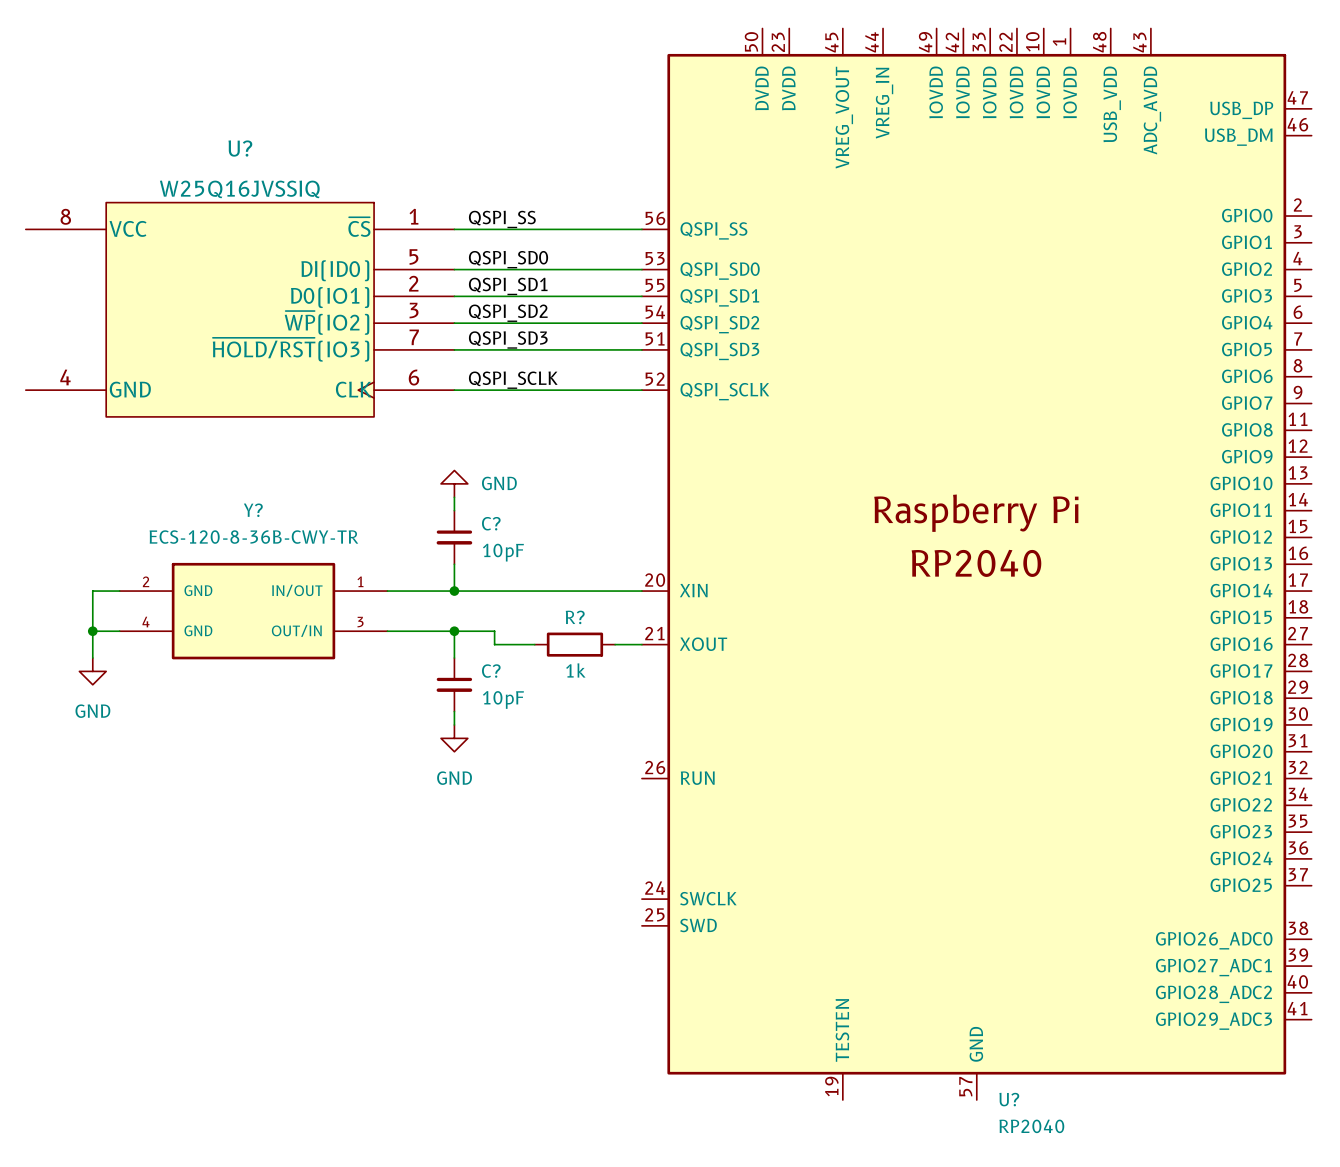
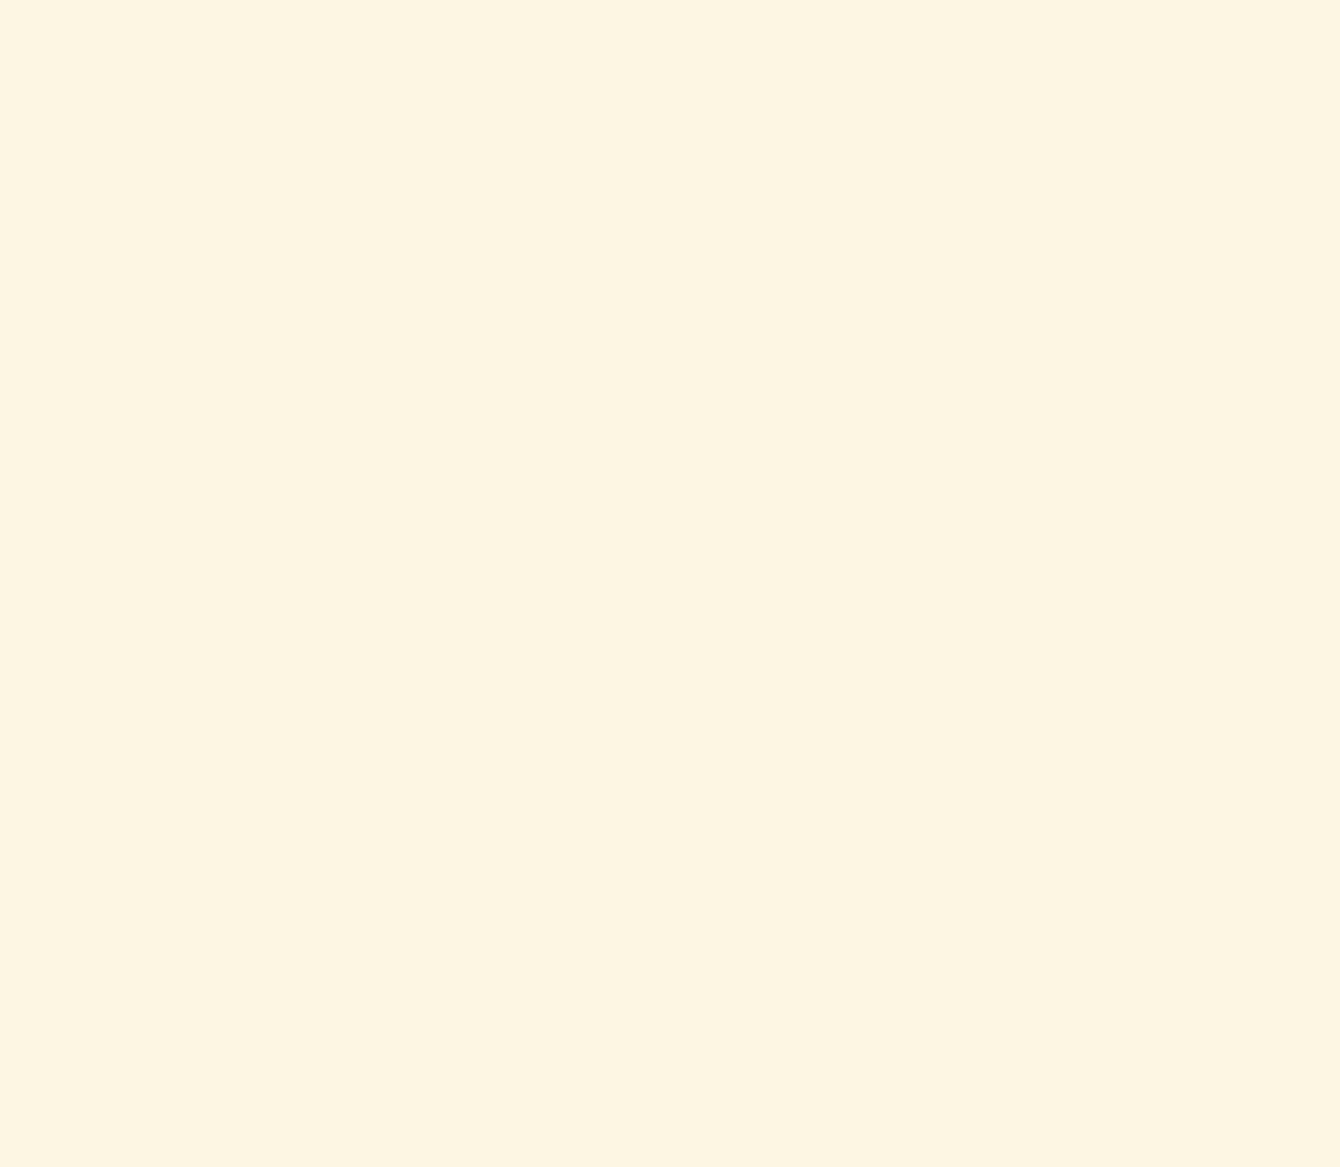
label: QSPI_SS (502, 219) -> none
wire: (454, 229) (641, 229) -> none
label: QSPI_SD0 (508, 259) -> none
wire: (454, 269) (641, 269) -> none
label: QSPI_SD1 (508, 286) -> none
wire: (454, 296) (641, 296) -> none
U?: W25Q16JVSSIQ (240, 309) -> none
label: QSPI_SD2 (508, 313) -> none
wire: (454, 323) (641, 323) -> none
label: QSPI_SD3 (508, 340) -> none
wire: (454, 349) (641, 349) -> none
label: QSPI_SCLK (513, 380) -> none
wire: (454, 390) (641, 390) -> none
power symbol: GND (454, 483) -> none
wire: (454, 497) (454, 510) -> none
C?: 10pF (454, 537) -> none
wire: (454, 564) (454, 591) -> none
U?: RP2040 (976, 564) -> none
wire: (119, 591) (92, 591) (92, 658) -> none
wire: (387, 591) (641, 591) -> none
junction: (454, 591) -> none
Y?: ECS-120-8-36B-CWY-TR (253, 611) -> none
wire: (92, 631) (119, 631) -> none
junction: (92, 631) -> none
wire: (387, 631) (494, 631) (494, 644) (534, 644) -> none
wire: (454, 631) (454, 658) -> none
junction: (454, 631) -> none
R?: 1k (574, 644) -> none
wire: (615, 644) (641, 644) -> none
power symbol: GND (92, 671) -> none
C?: 10pF (454, 684) -> none
wire: (454, 711) (454, 724) -> none
power symbol: GND (454, 738) -> none

